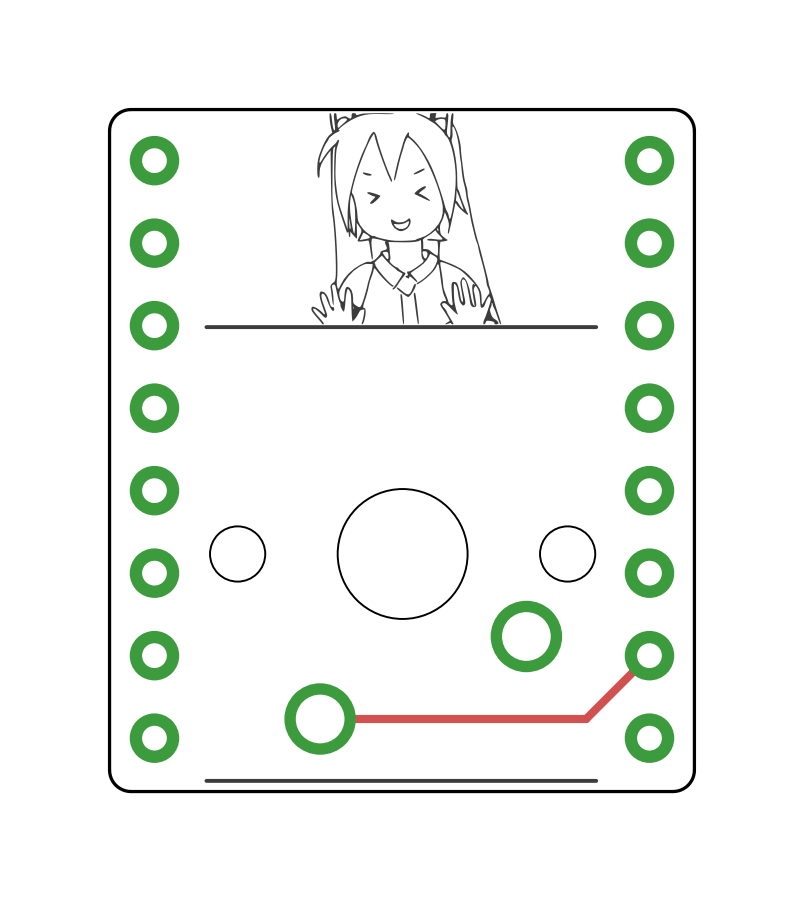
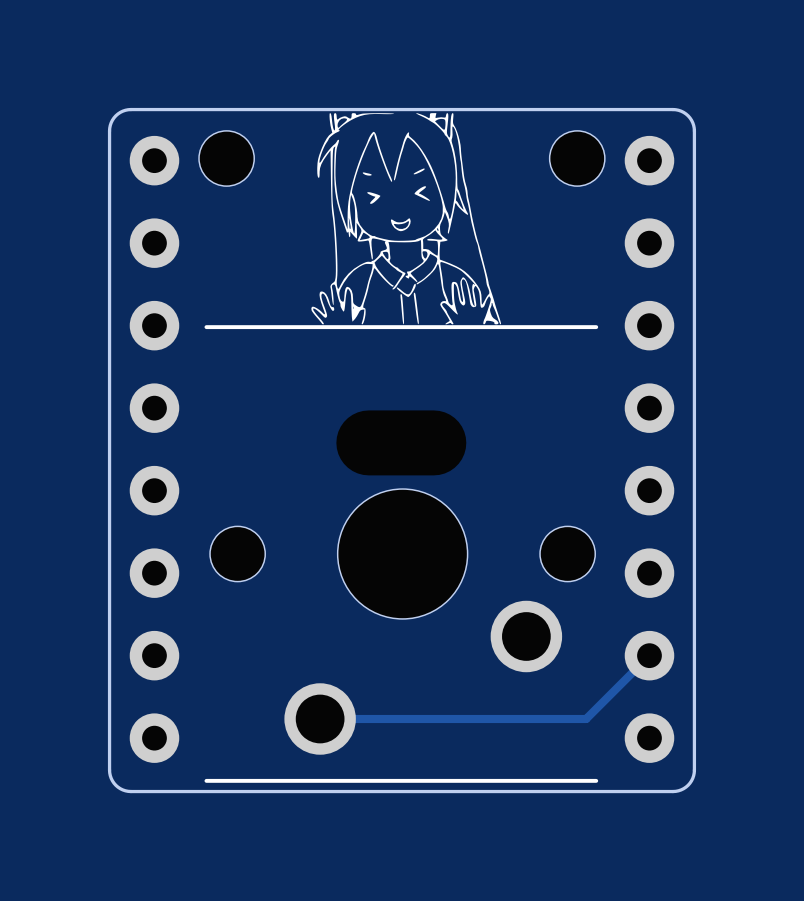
part: none -> (226, 158)
part: none -> (577, 158)

